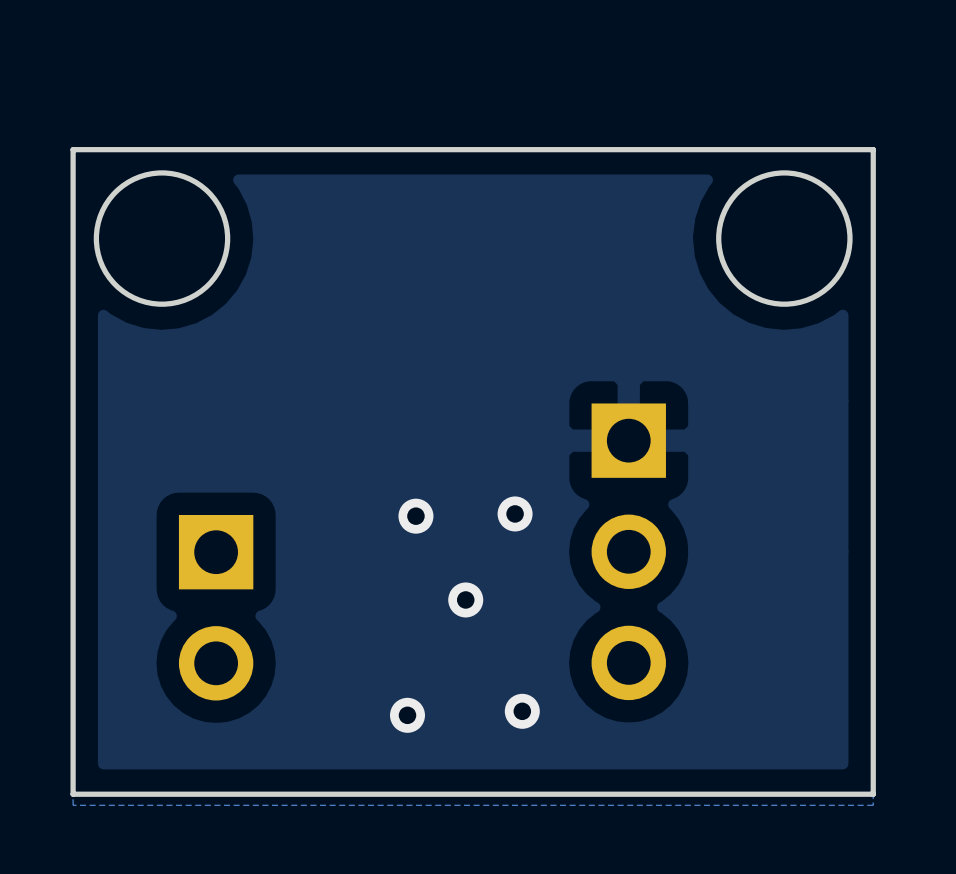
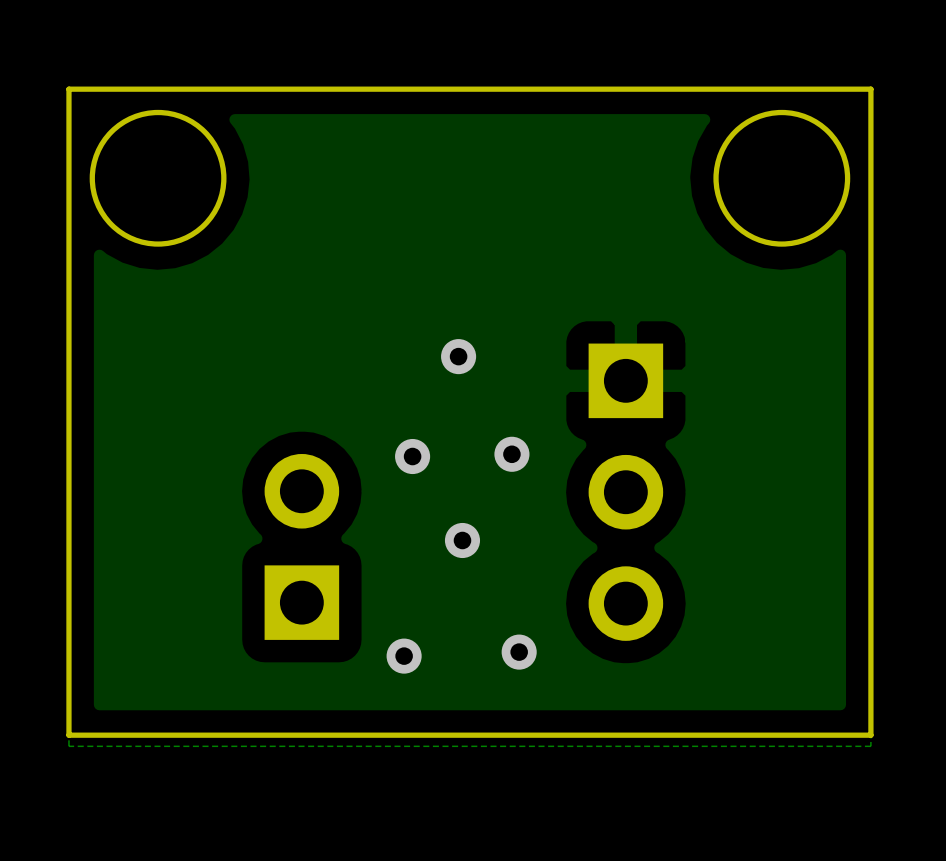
via: none -> (458, 356)
part rotation: 0° (216, 607) -> 180° (301, 546)

